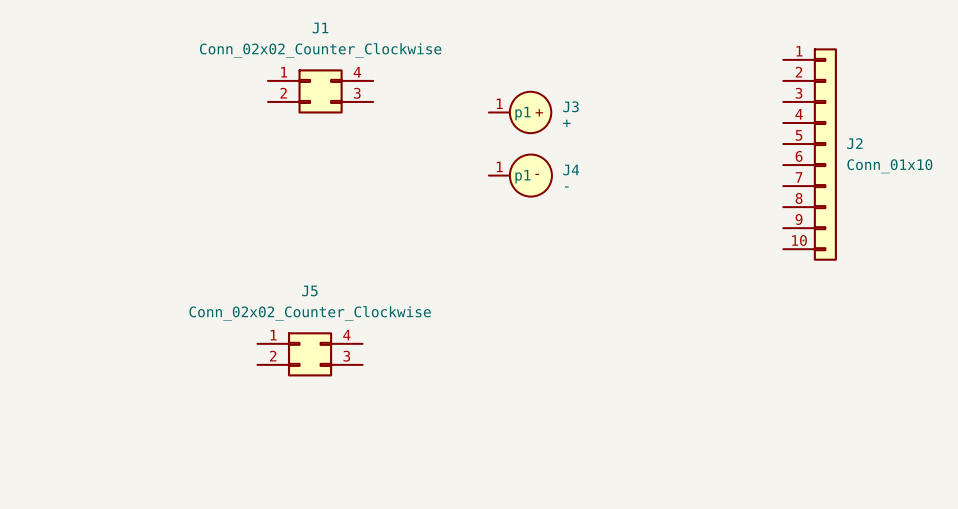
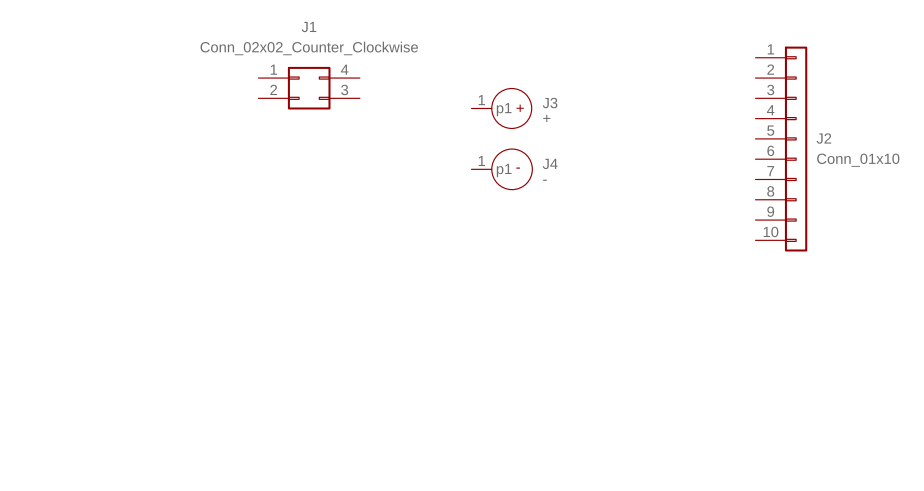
J5: Conn_02x02_Counter_Clockwise (310, 354) -> none

